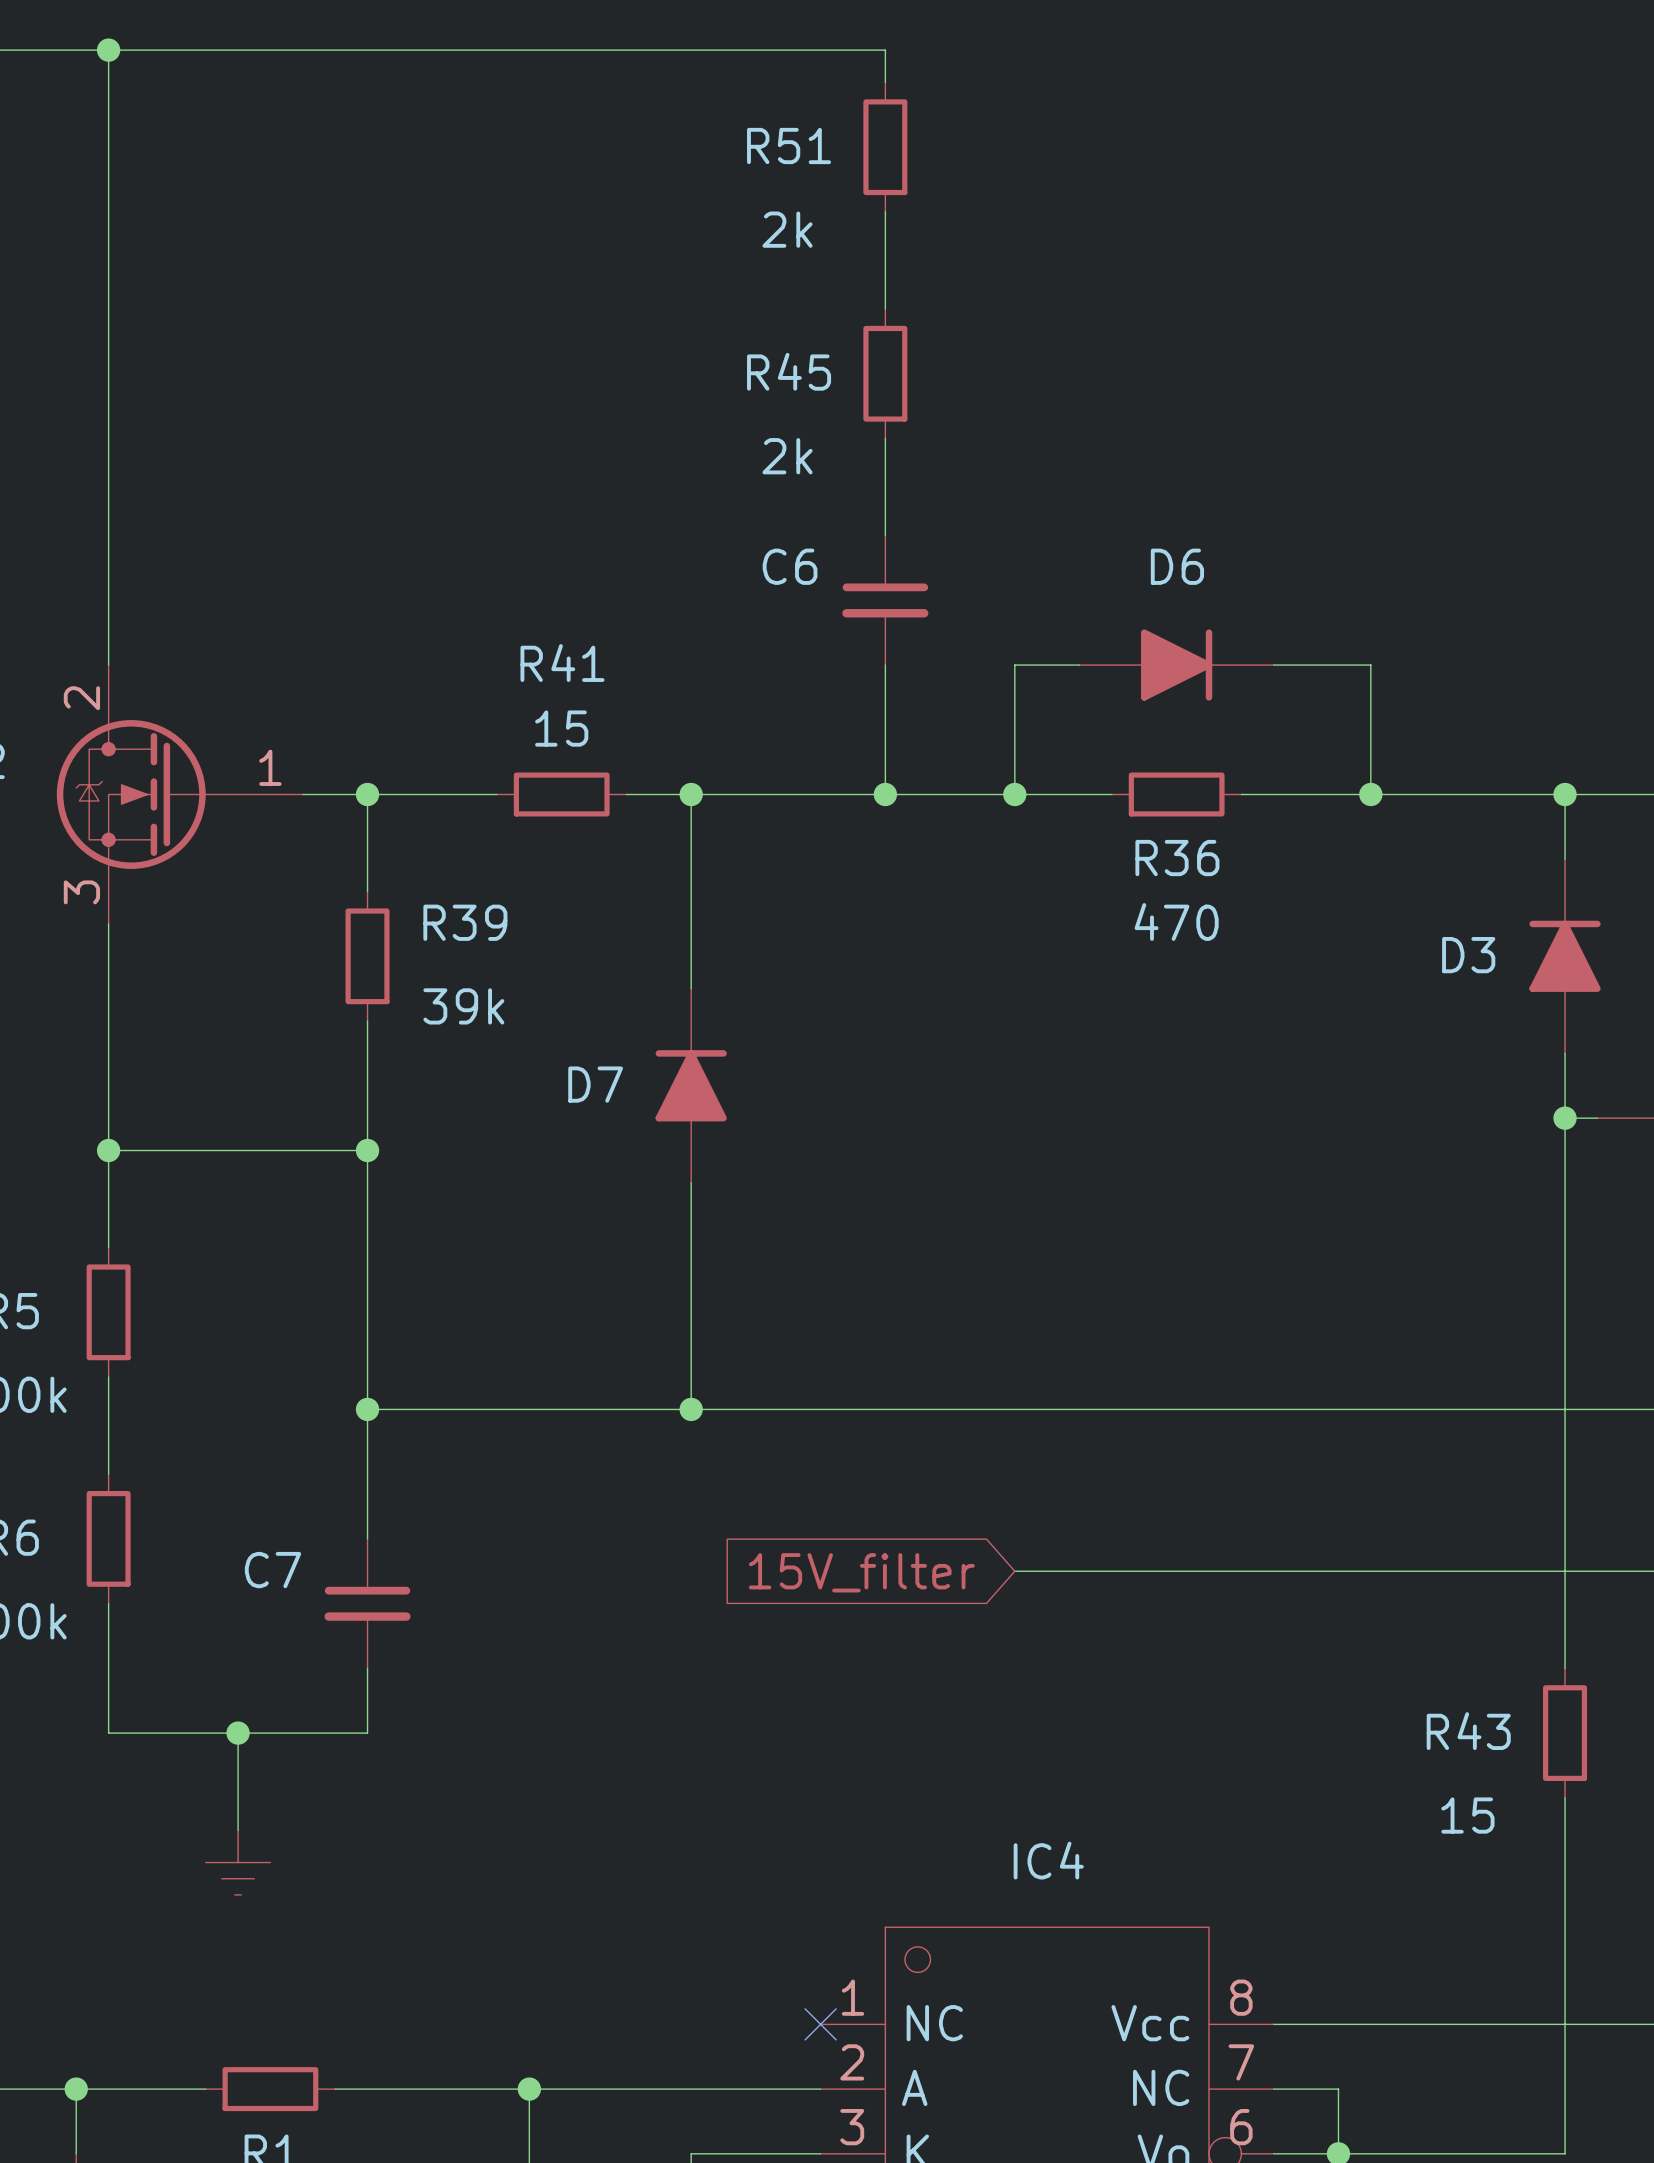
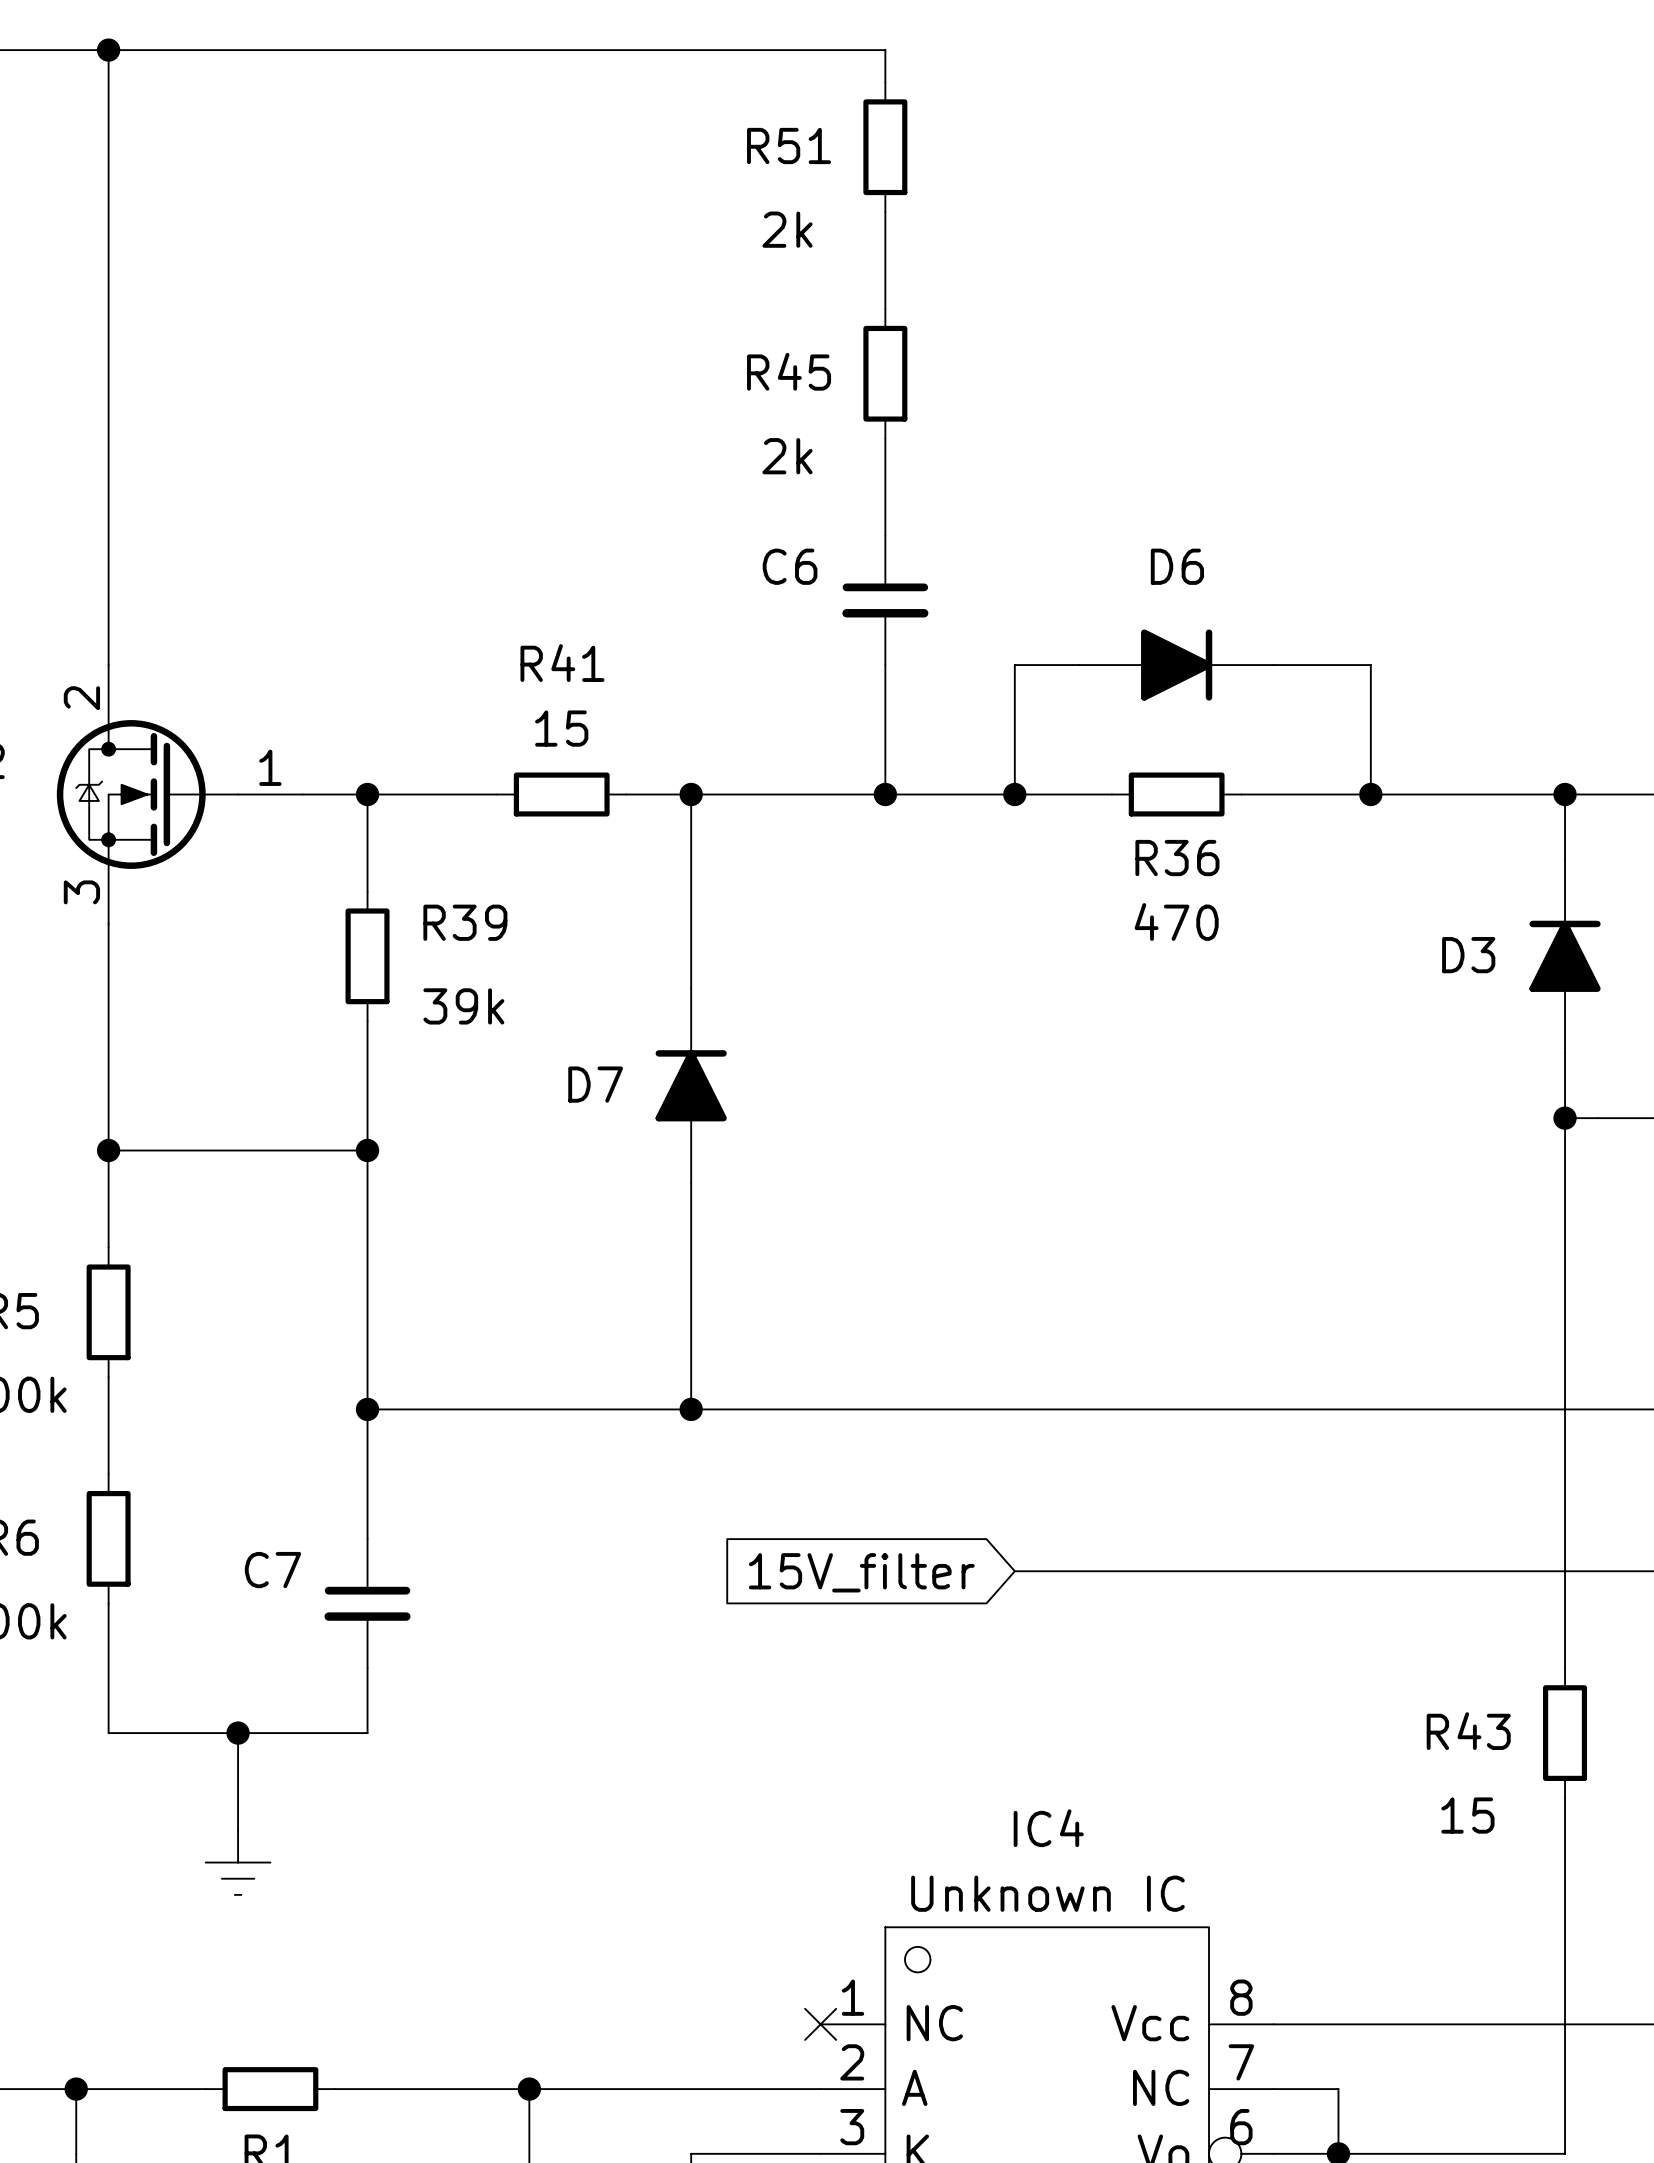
IC4 name position: IC4 (1048, 1860) -> IC4 (1048, 1828)
IC4 value: none -> Unknown IC (1047, 1893)

